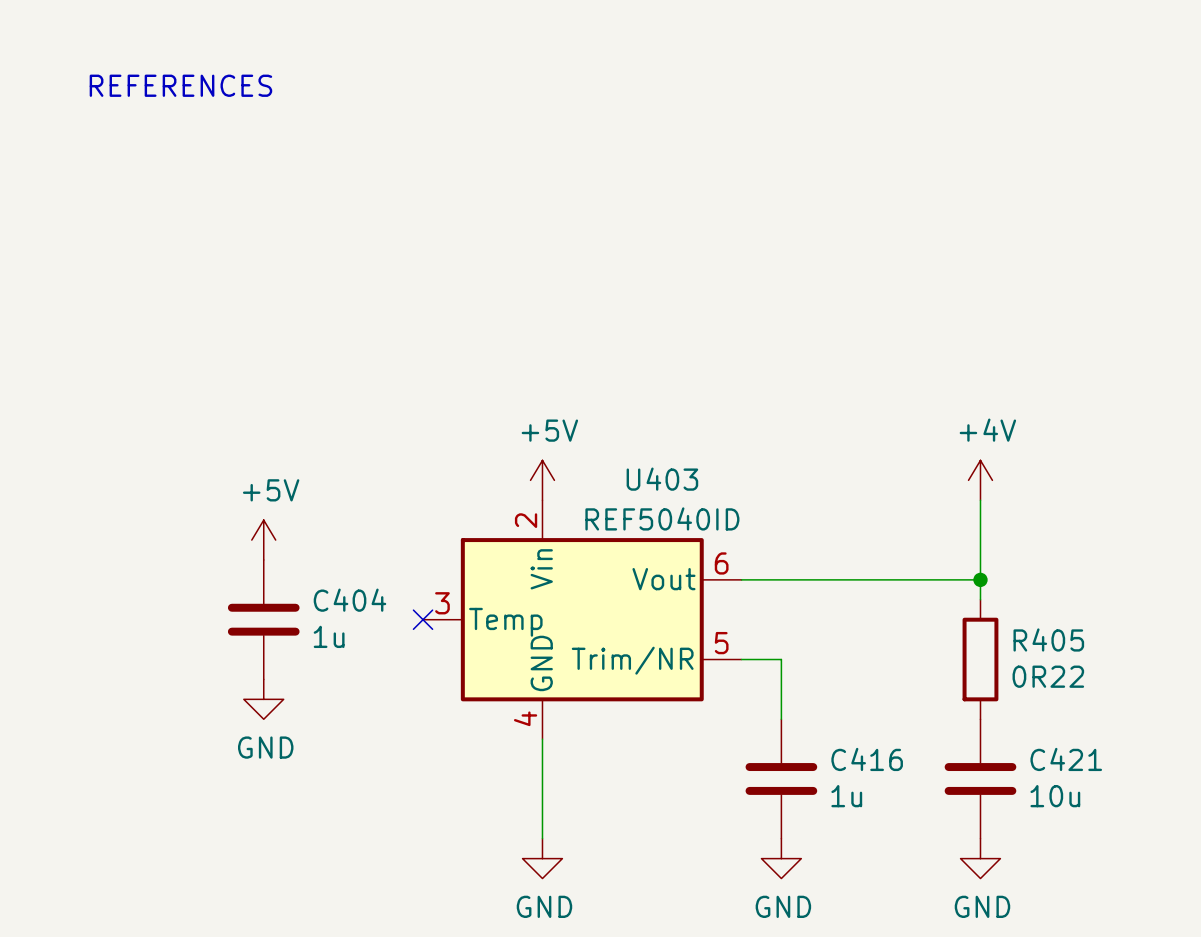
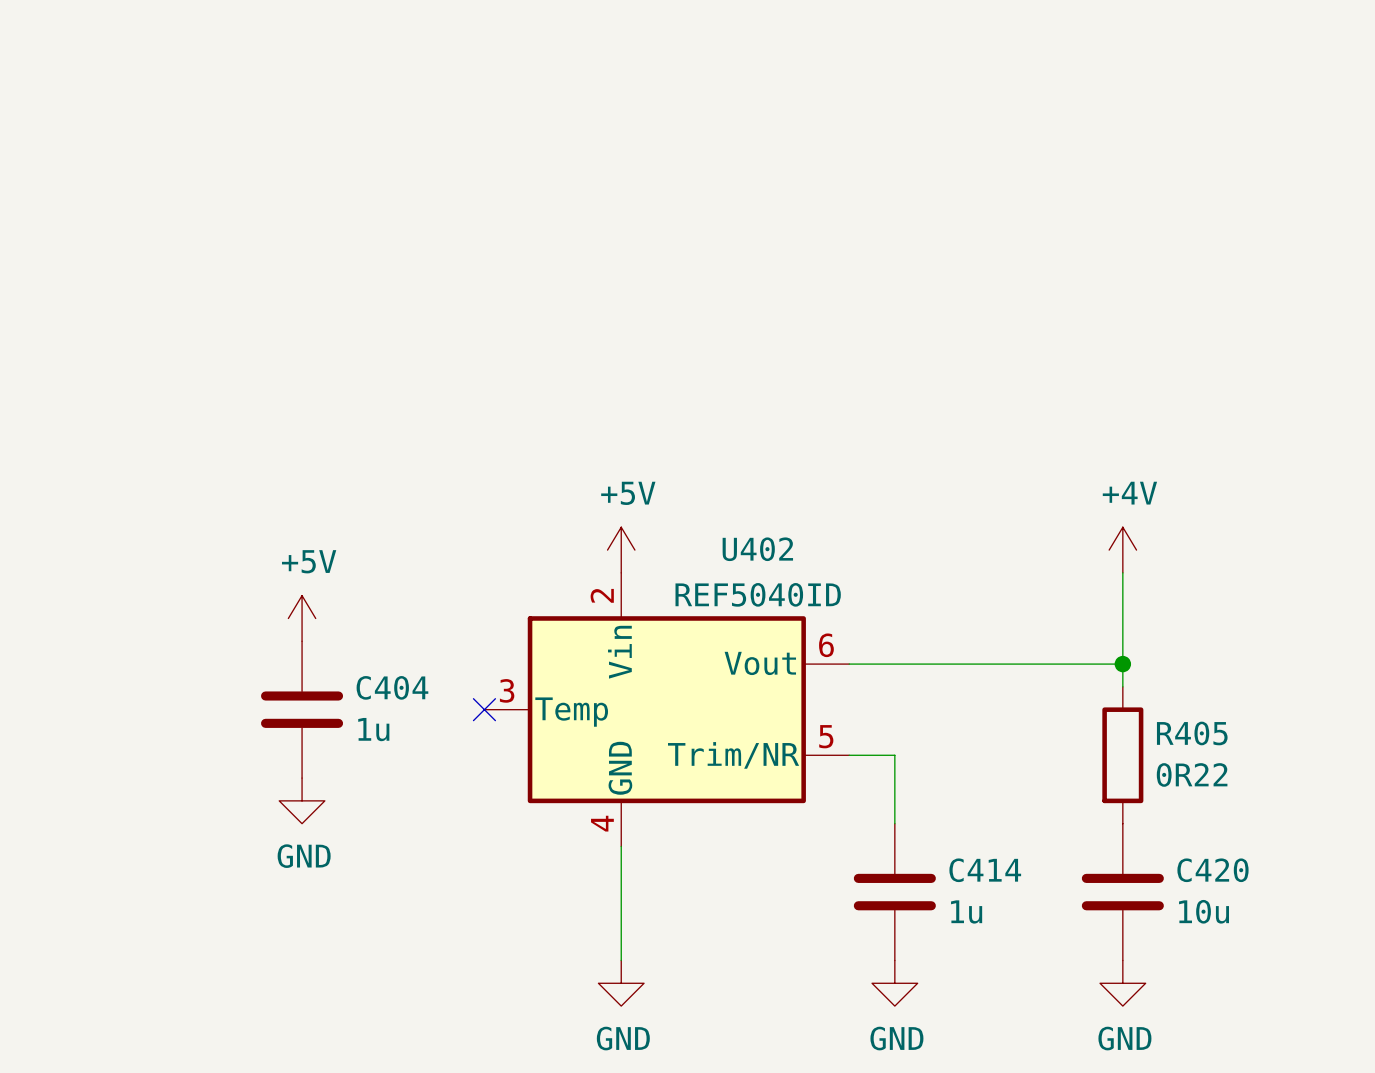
text: REFERENCES (180, 85) -> none
U403 name: U403 (662, 479) -> U402 (757, 549)
C416 name: C416 (867, 759) -> C414 (985, 870)
C421 name: C421 (1066, 759) -> C420 (1212, 870)

